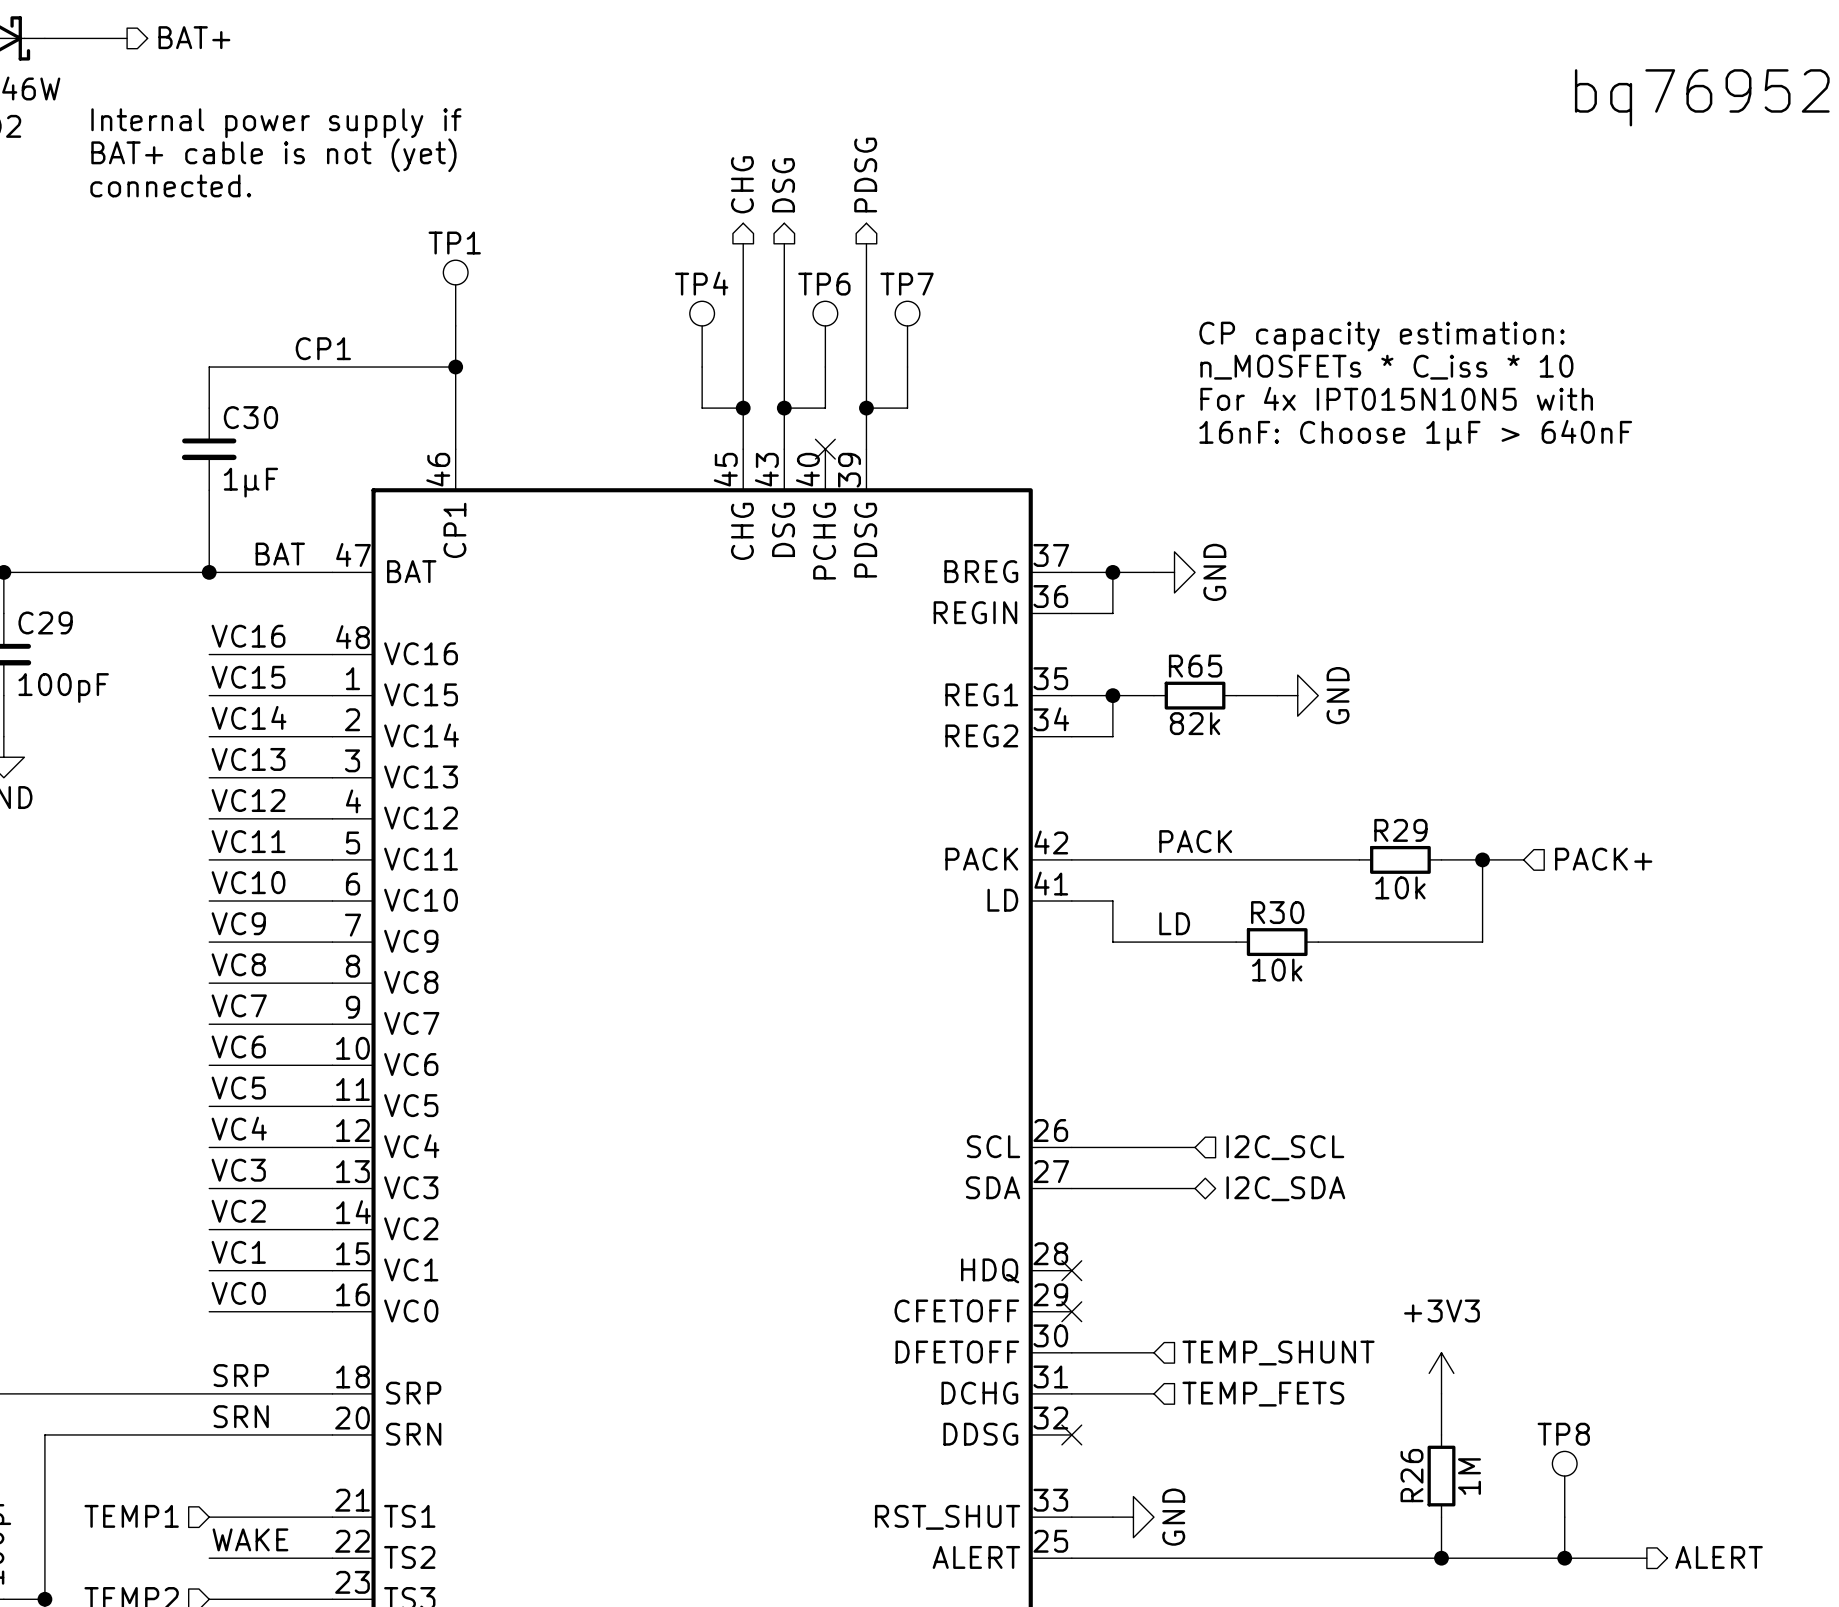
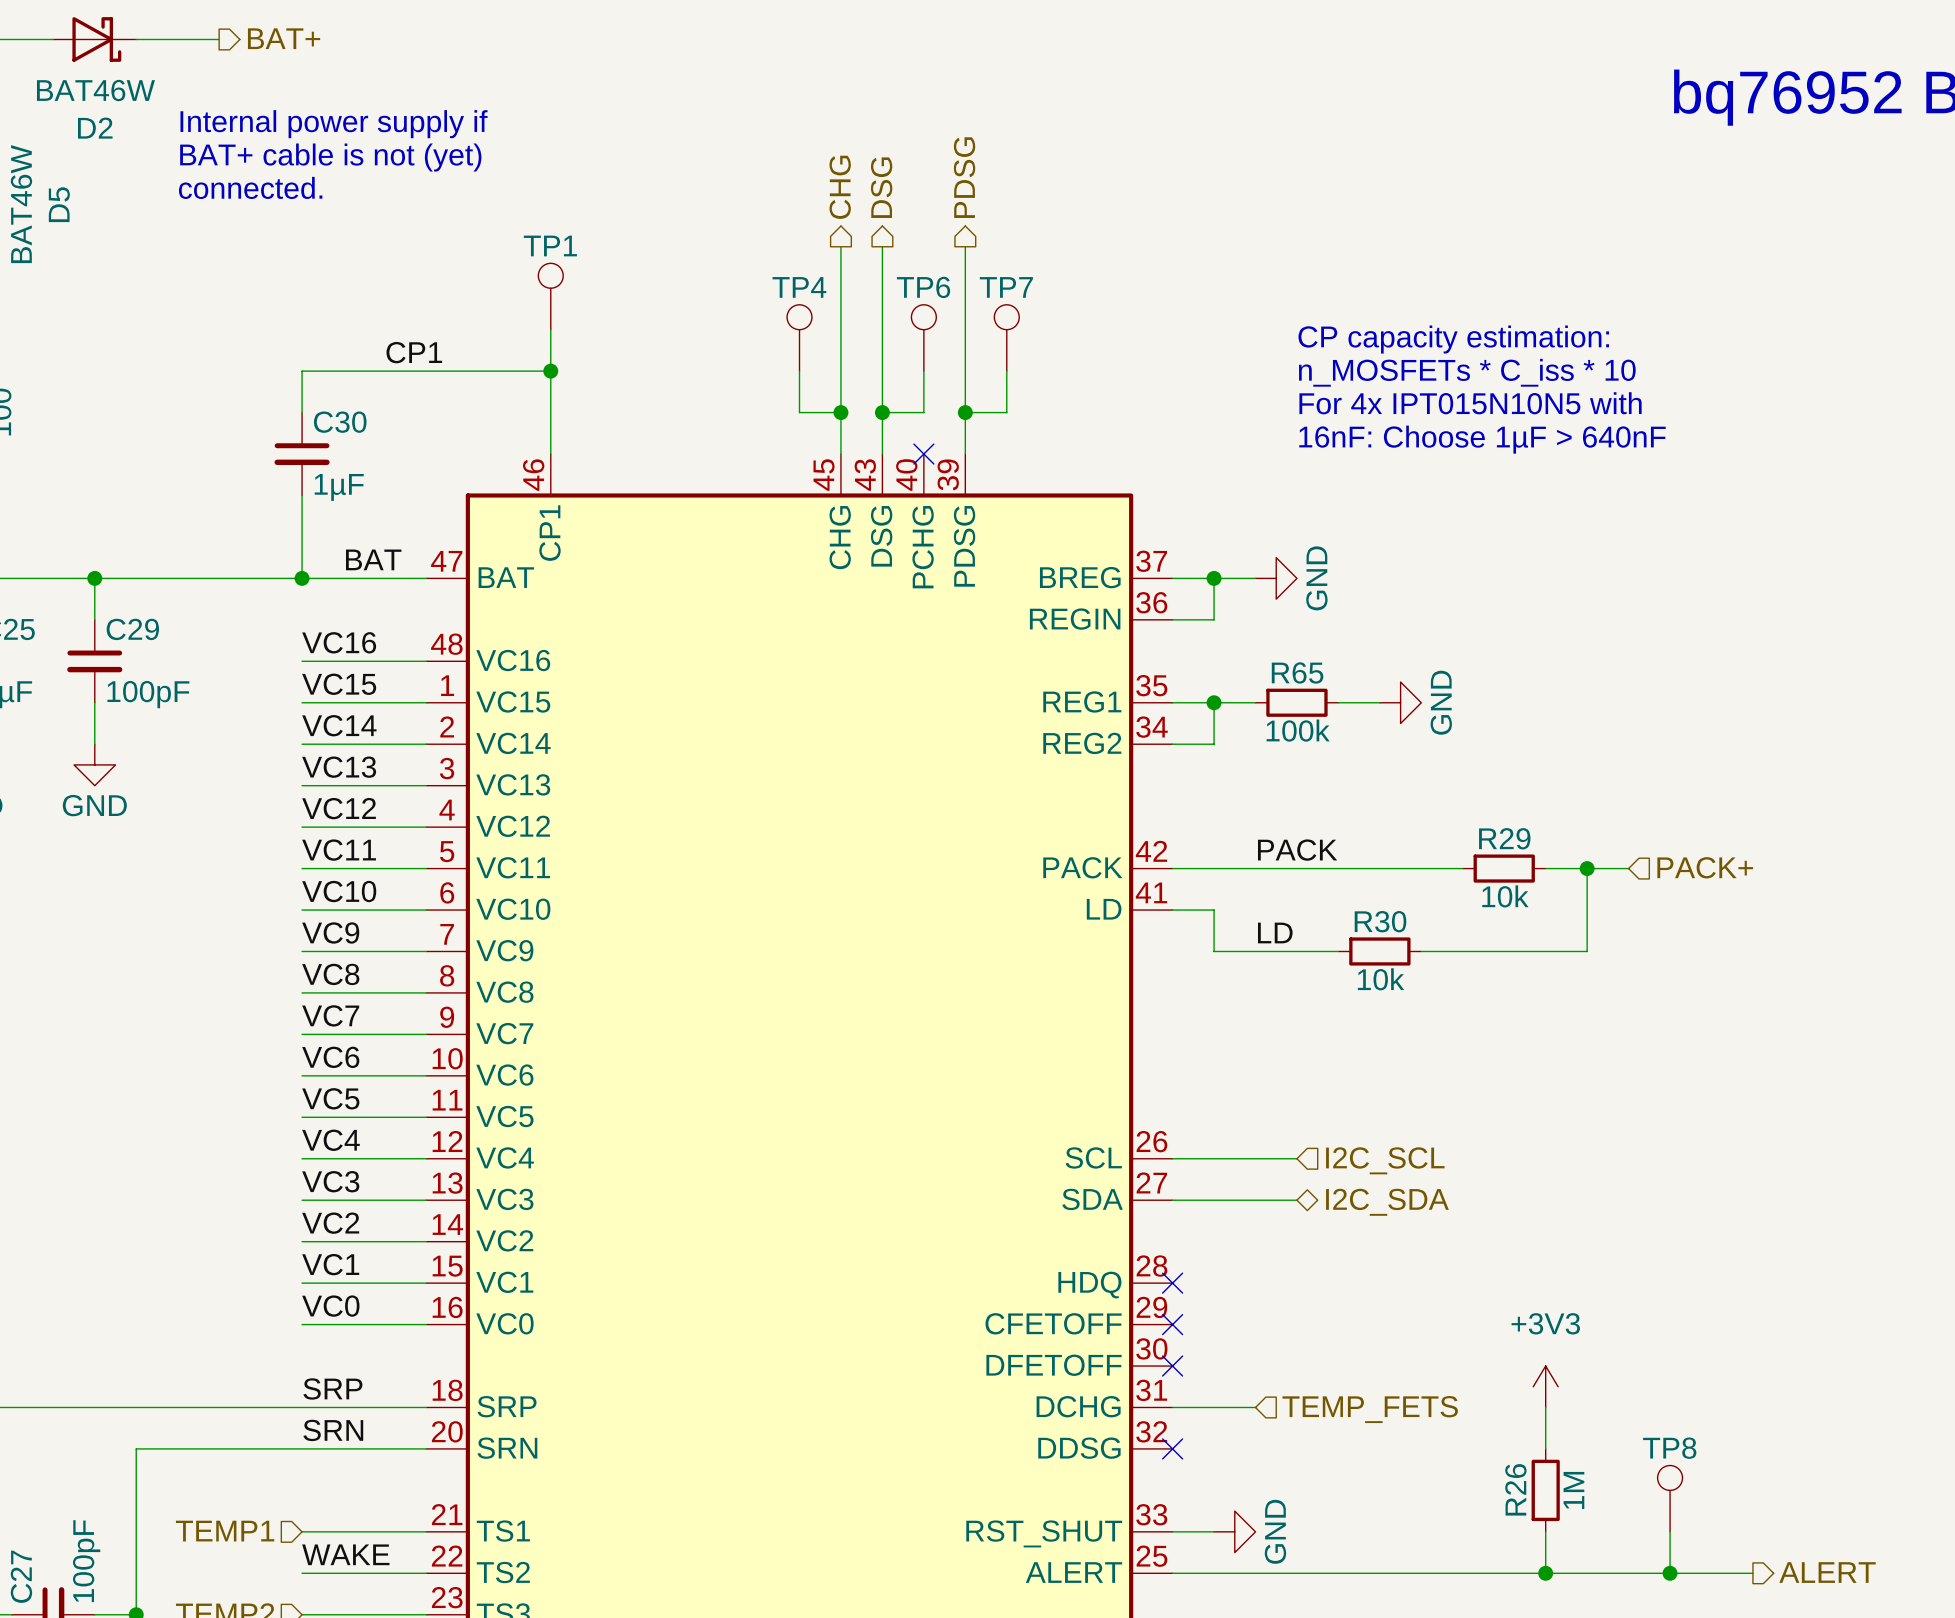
R65 value: 82k (1195, 723) -> 100k (1298, 730)
wire: (1071, 1352) (1153, 1352) -> none
no-connect mark: none -> (1172, 1366)
hierarchical label: TEMP_SHUNT (1278, 1353) -> none

